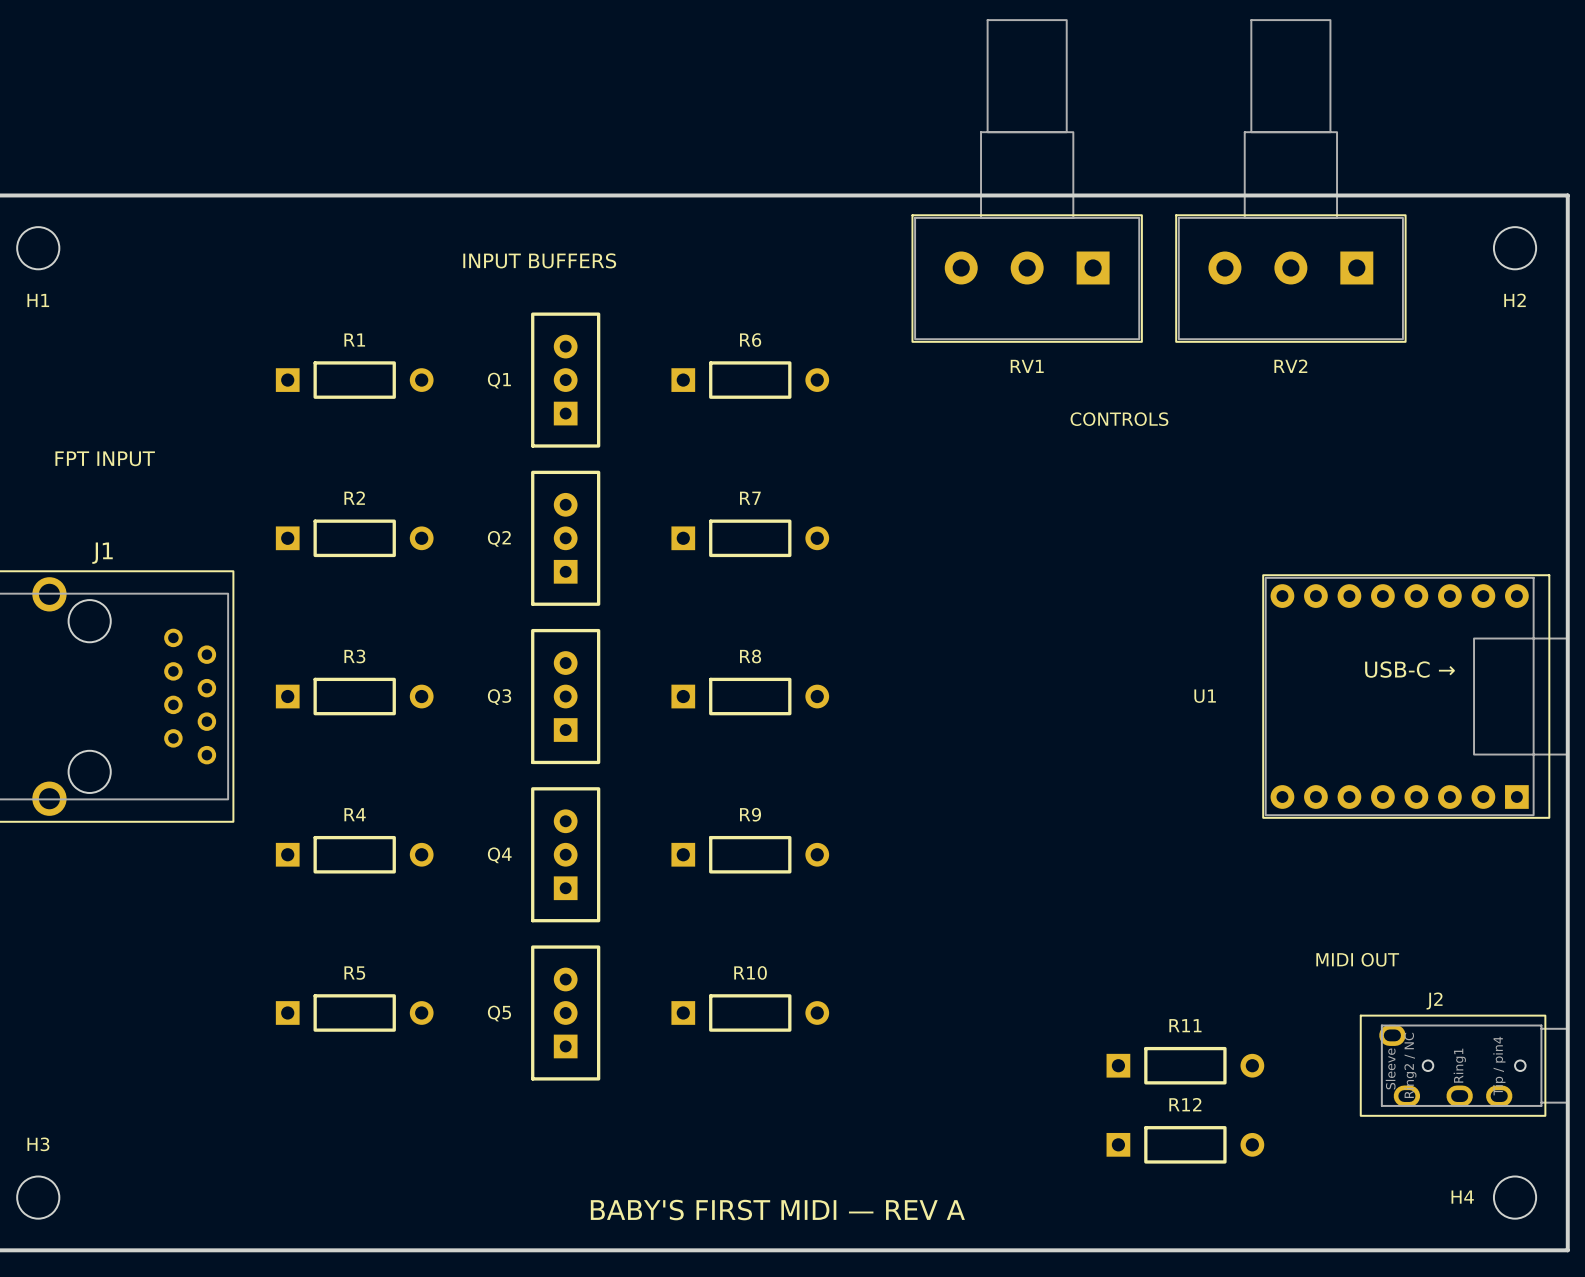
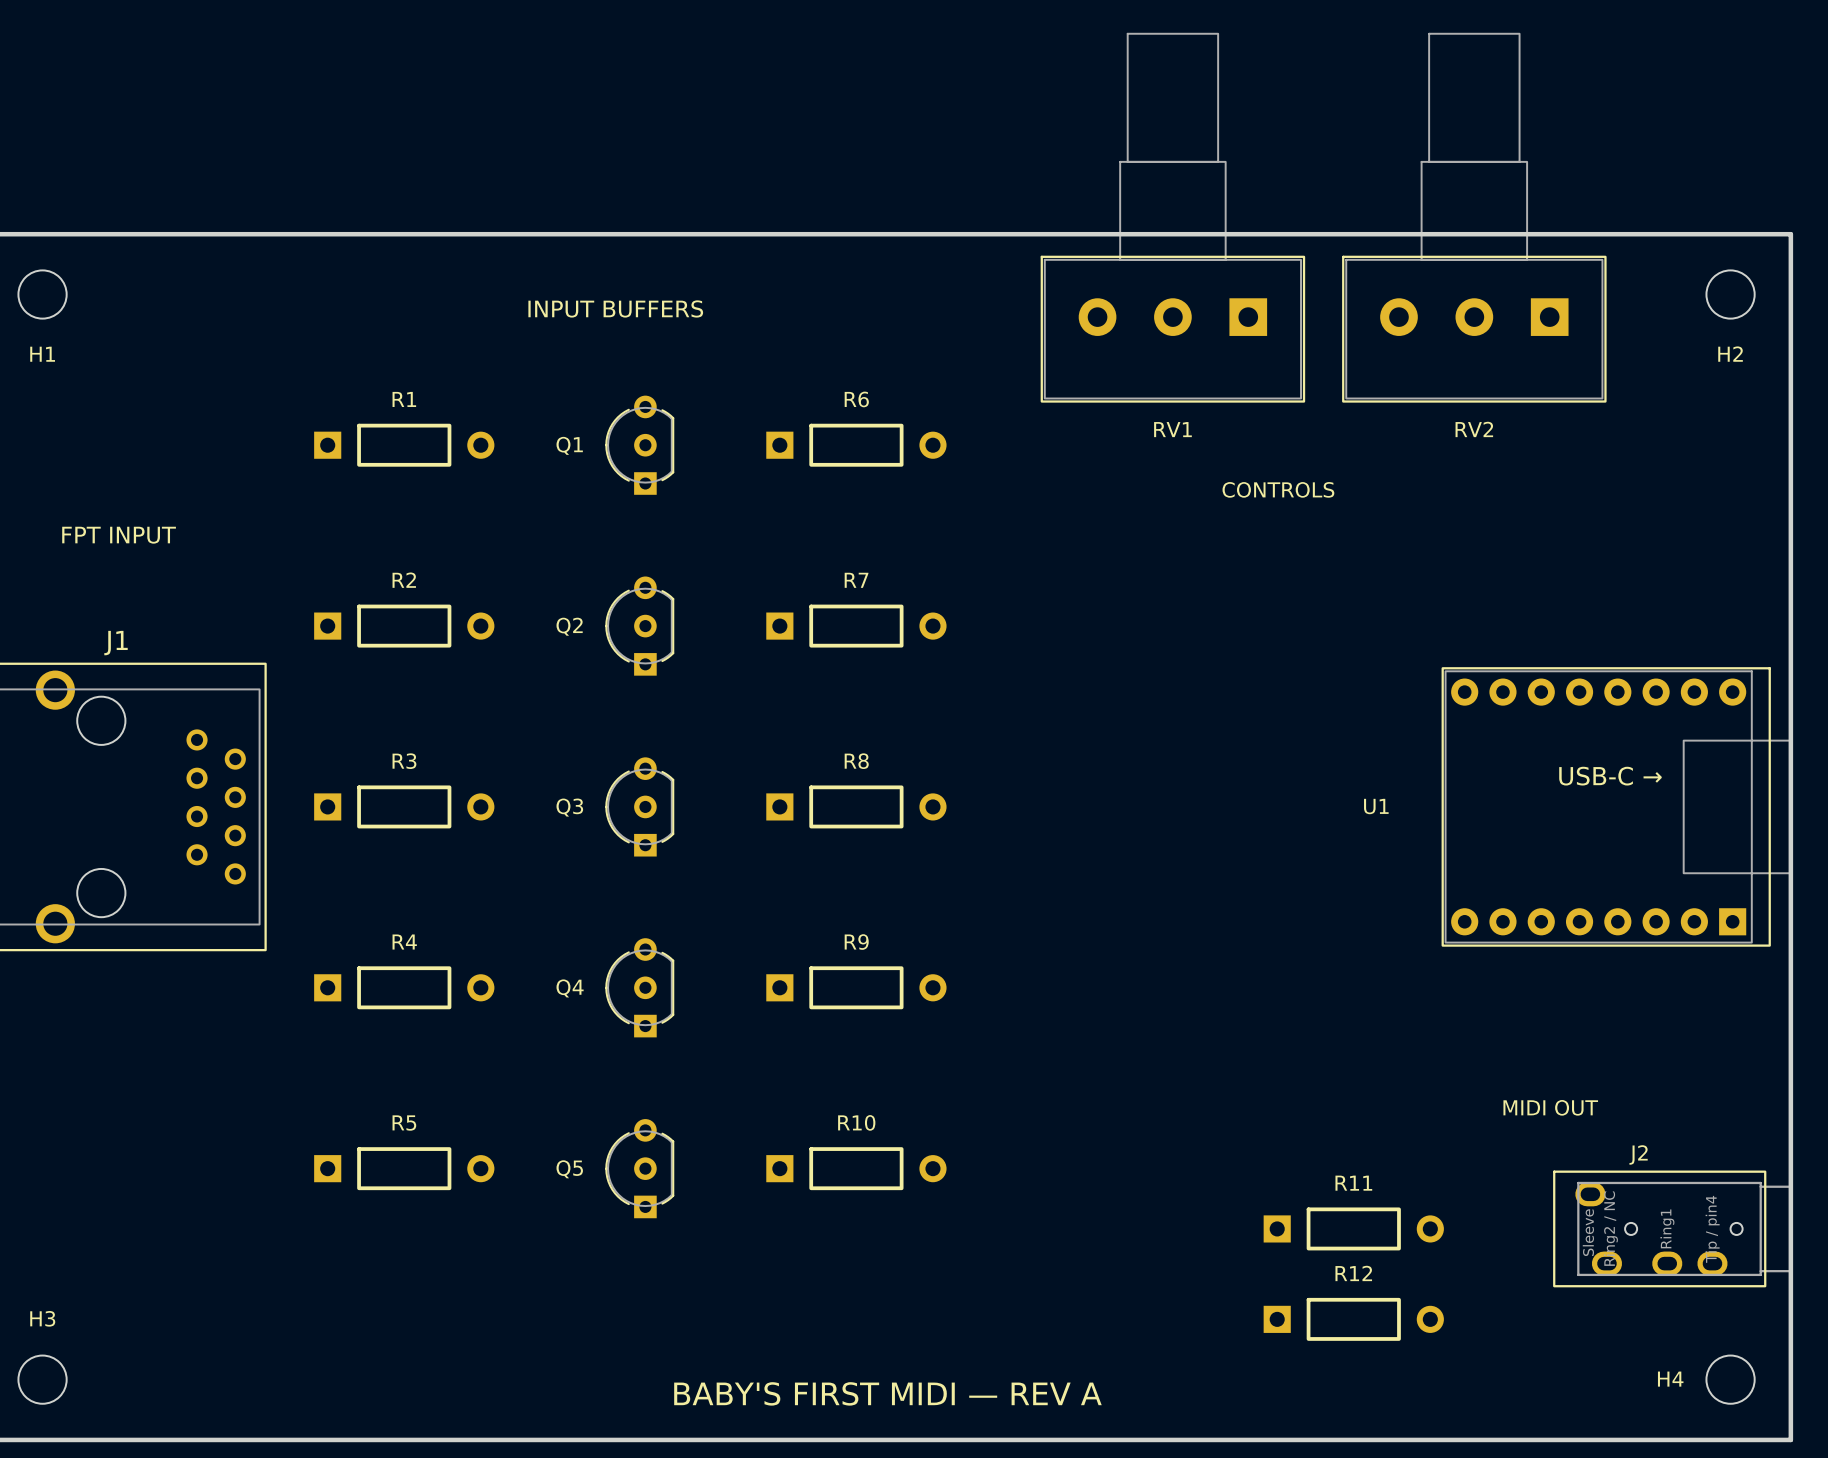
Q1 footprint: [531, 312, 601, 448] -> [605, 395, 675, 495]
Q2 footprint: [531, 470, 601, 606] -> [605, 576, 675, 676]
Q3 footprint: [531, 628, 601, 765] -> [605, 757, 675, 857]
Q4 footprint: [531, 787, 601, 923] -> [605, 938, 675, 1038]
Q5 footprint: [531, 945, 601, 1081] -> [605, 1119, 675, 1219]

